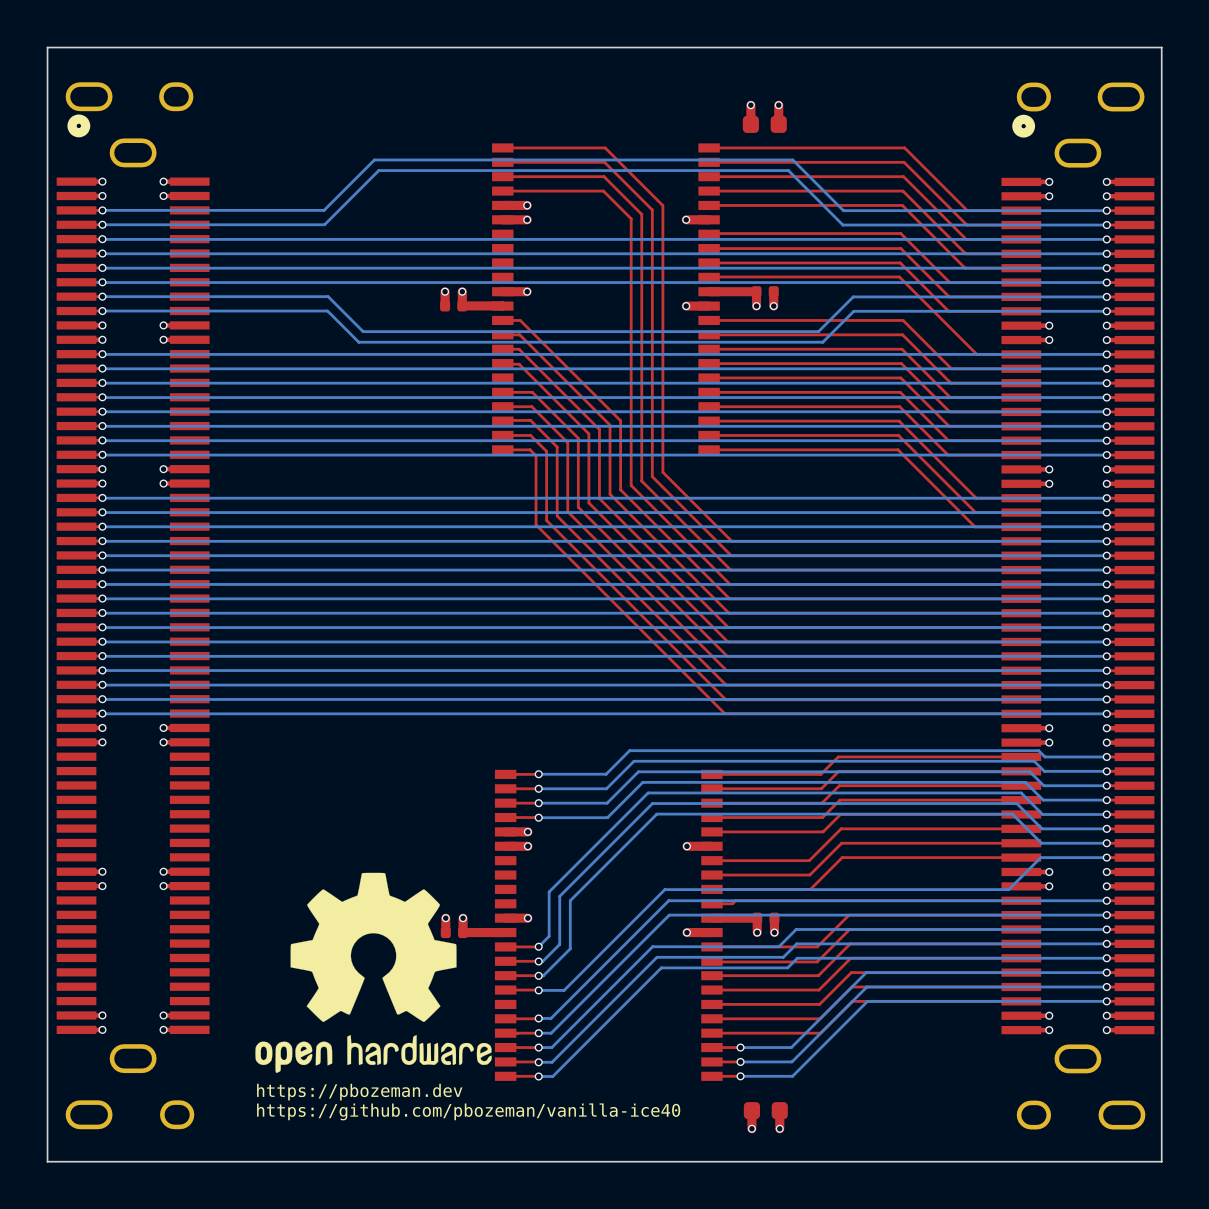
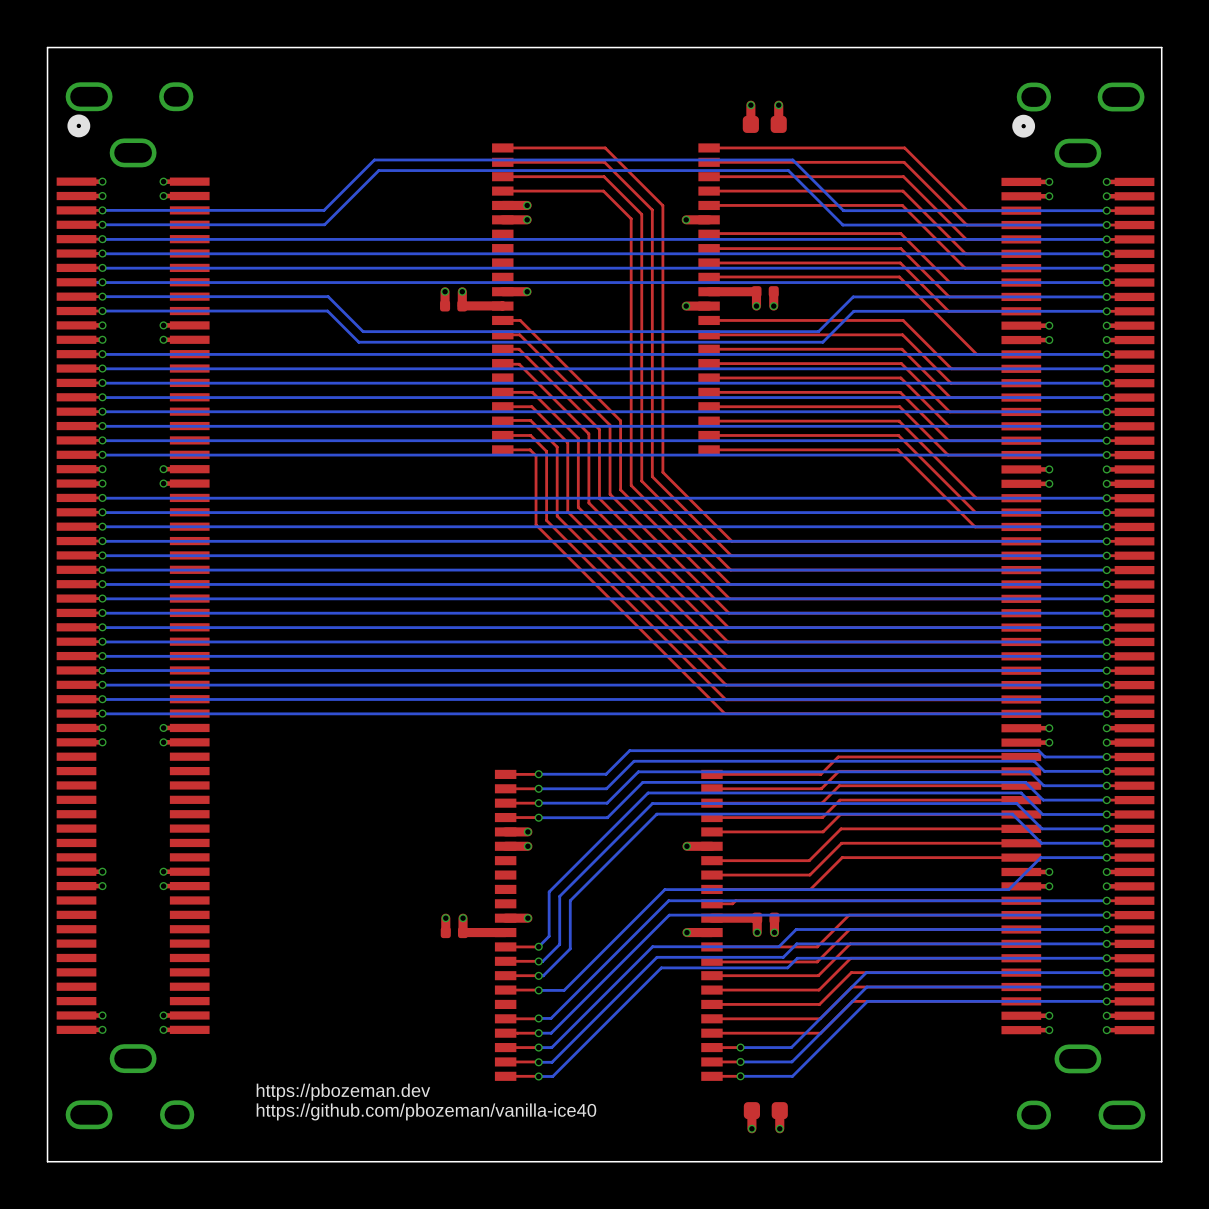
drawing: [255, 872, 492, 1073] -> none

